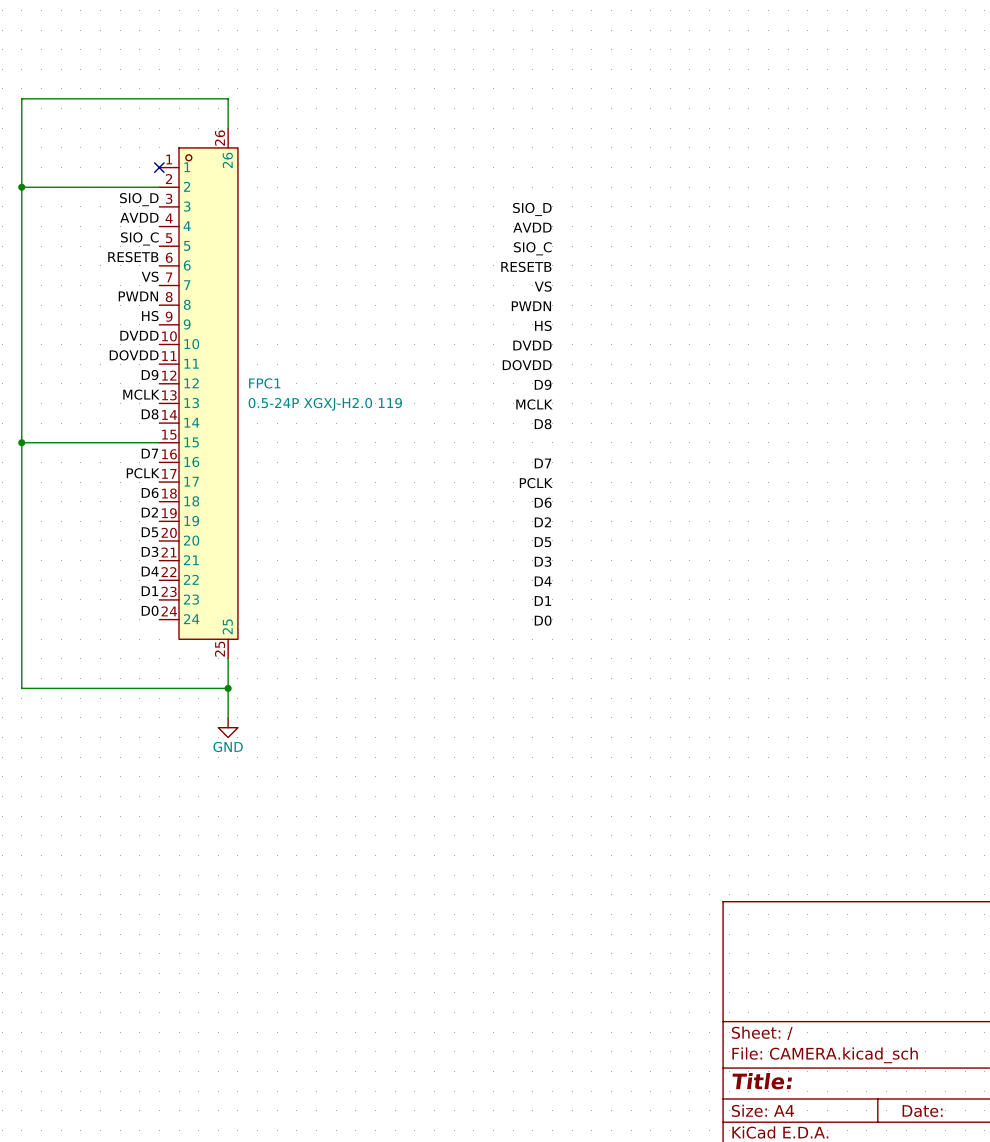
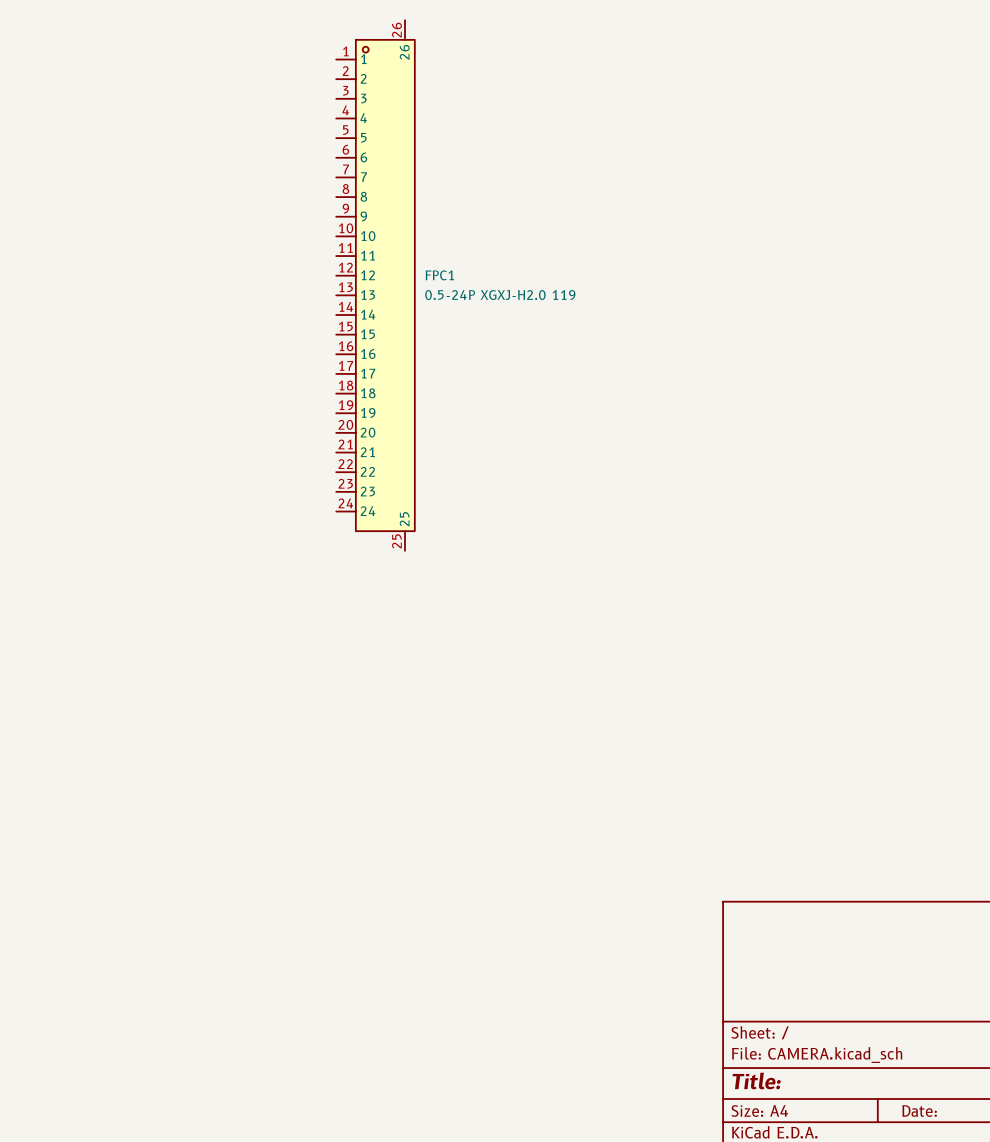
wire: (228, 128) (228, 98) (21, 98) (21, 688) (228, 688) -> none
no-connect mark: (159, 167) -> none
wire: (21, 187) (159, 187) -> none
junction: (21, 187) -> none
label: SIO_D (139, 199) -> none
label: SIO_D (532, 209) -> none
label: AVDD (139, 217) -> none
label: AVDD (532, 227) -> none
label: SIO_C (139, 238) -> none
label: SIO_C (532, 248) -> none
label: RESETB (133, 257) -> none
label: RESETB (526, 266) -> none
label: VS (150, 276) -> none
label: VS (543, 286) -> none
label: PWDN (138, 296) -> none
label: PWDN (531, 306) -> none
label: HS (150, 316) -> none
label: HS (543, 325) -> none
label: DVDD (139, 335) -> none
label: DVDD (532, 345) -> none
label: DOVDD (134, 355) -> none
label: DOVDD (527, 365) -> none
label: D9 (150, 375) -> none
label: D9 (543, 384) -> none
FPC1 position: (198, 393) -> (375, 285)
label: MCLK (141, 394) -> none
label: MCLK (534, 404) -> none
label: D8 (150, 414) -> none
label: D8 (543, 424) -> none
wire: (21, 442) (159, 442) -> none
junction: (21, 442) -> none
label: D7 (149, 453) -> none
label: D7 (543, 463) -> none
label: PCLK (143, 473) -> none
label: PCLK (536, 483) -> none
label: D6 (150, 492) -> none
label: D6 (543, 502) -> none
label: D2 (149, 512) -> none
label: D2 (542, 522) -> none
label: D5 (149, 532) -> none
label: D5 (542, 542) -> none
label: D3 (149, 551) -> none
label: D3 (543, 561) -> none
label: D4 (150, 571) -> none
label: D4 (543, 581) -> none
label: D1 (149, 591) -> none
label: D1 (542, 601) -> none
label: D0 (150, 610) -> none
label: D0 (543, 620) -> none
wire: (228, 658) (228, 717) -> none
junction: (228, 688) -> none
power symbol: GND (228, 727) -> none

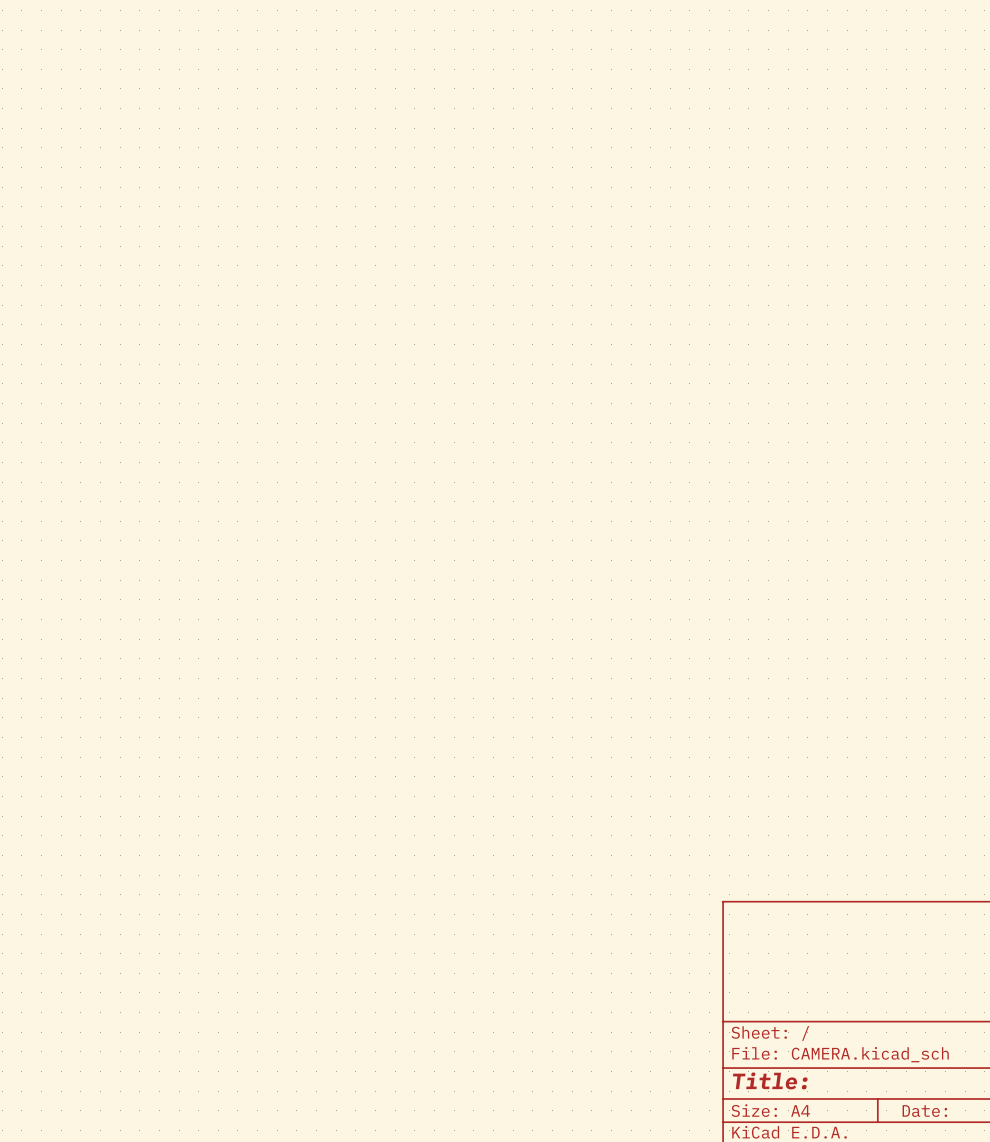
FPC1: 0.5-24P XGXJ-H2.0 119 (375, 285) -> none

